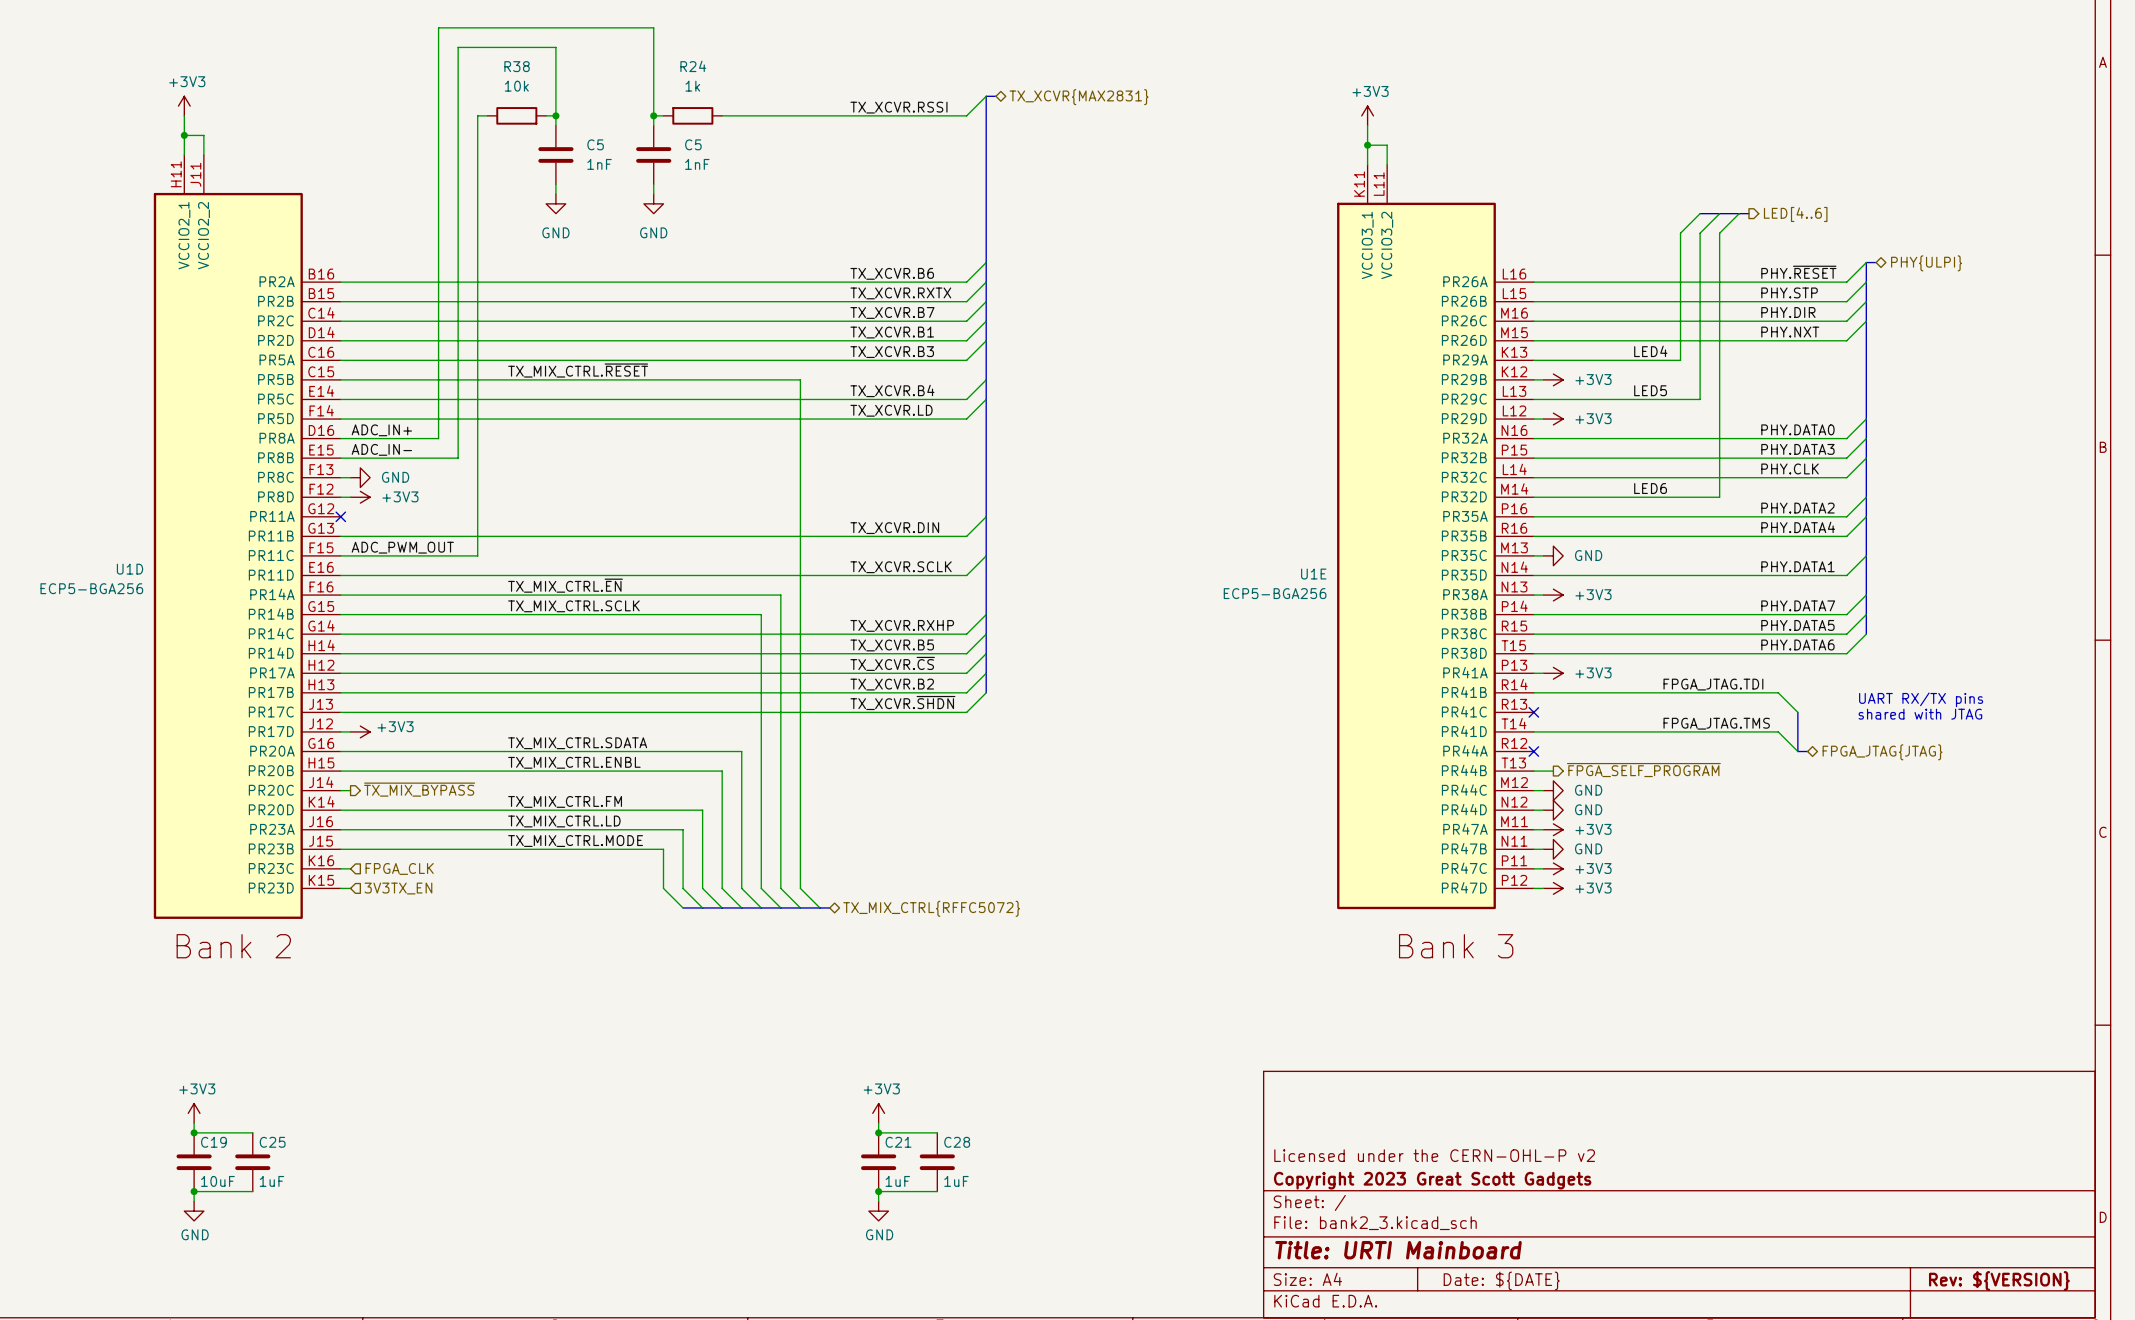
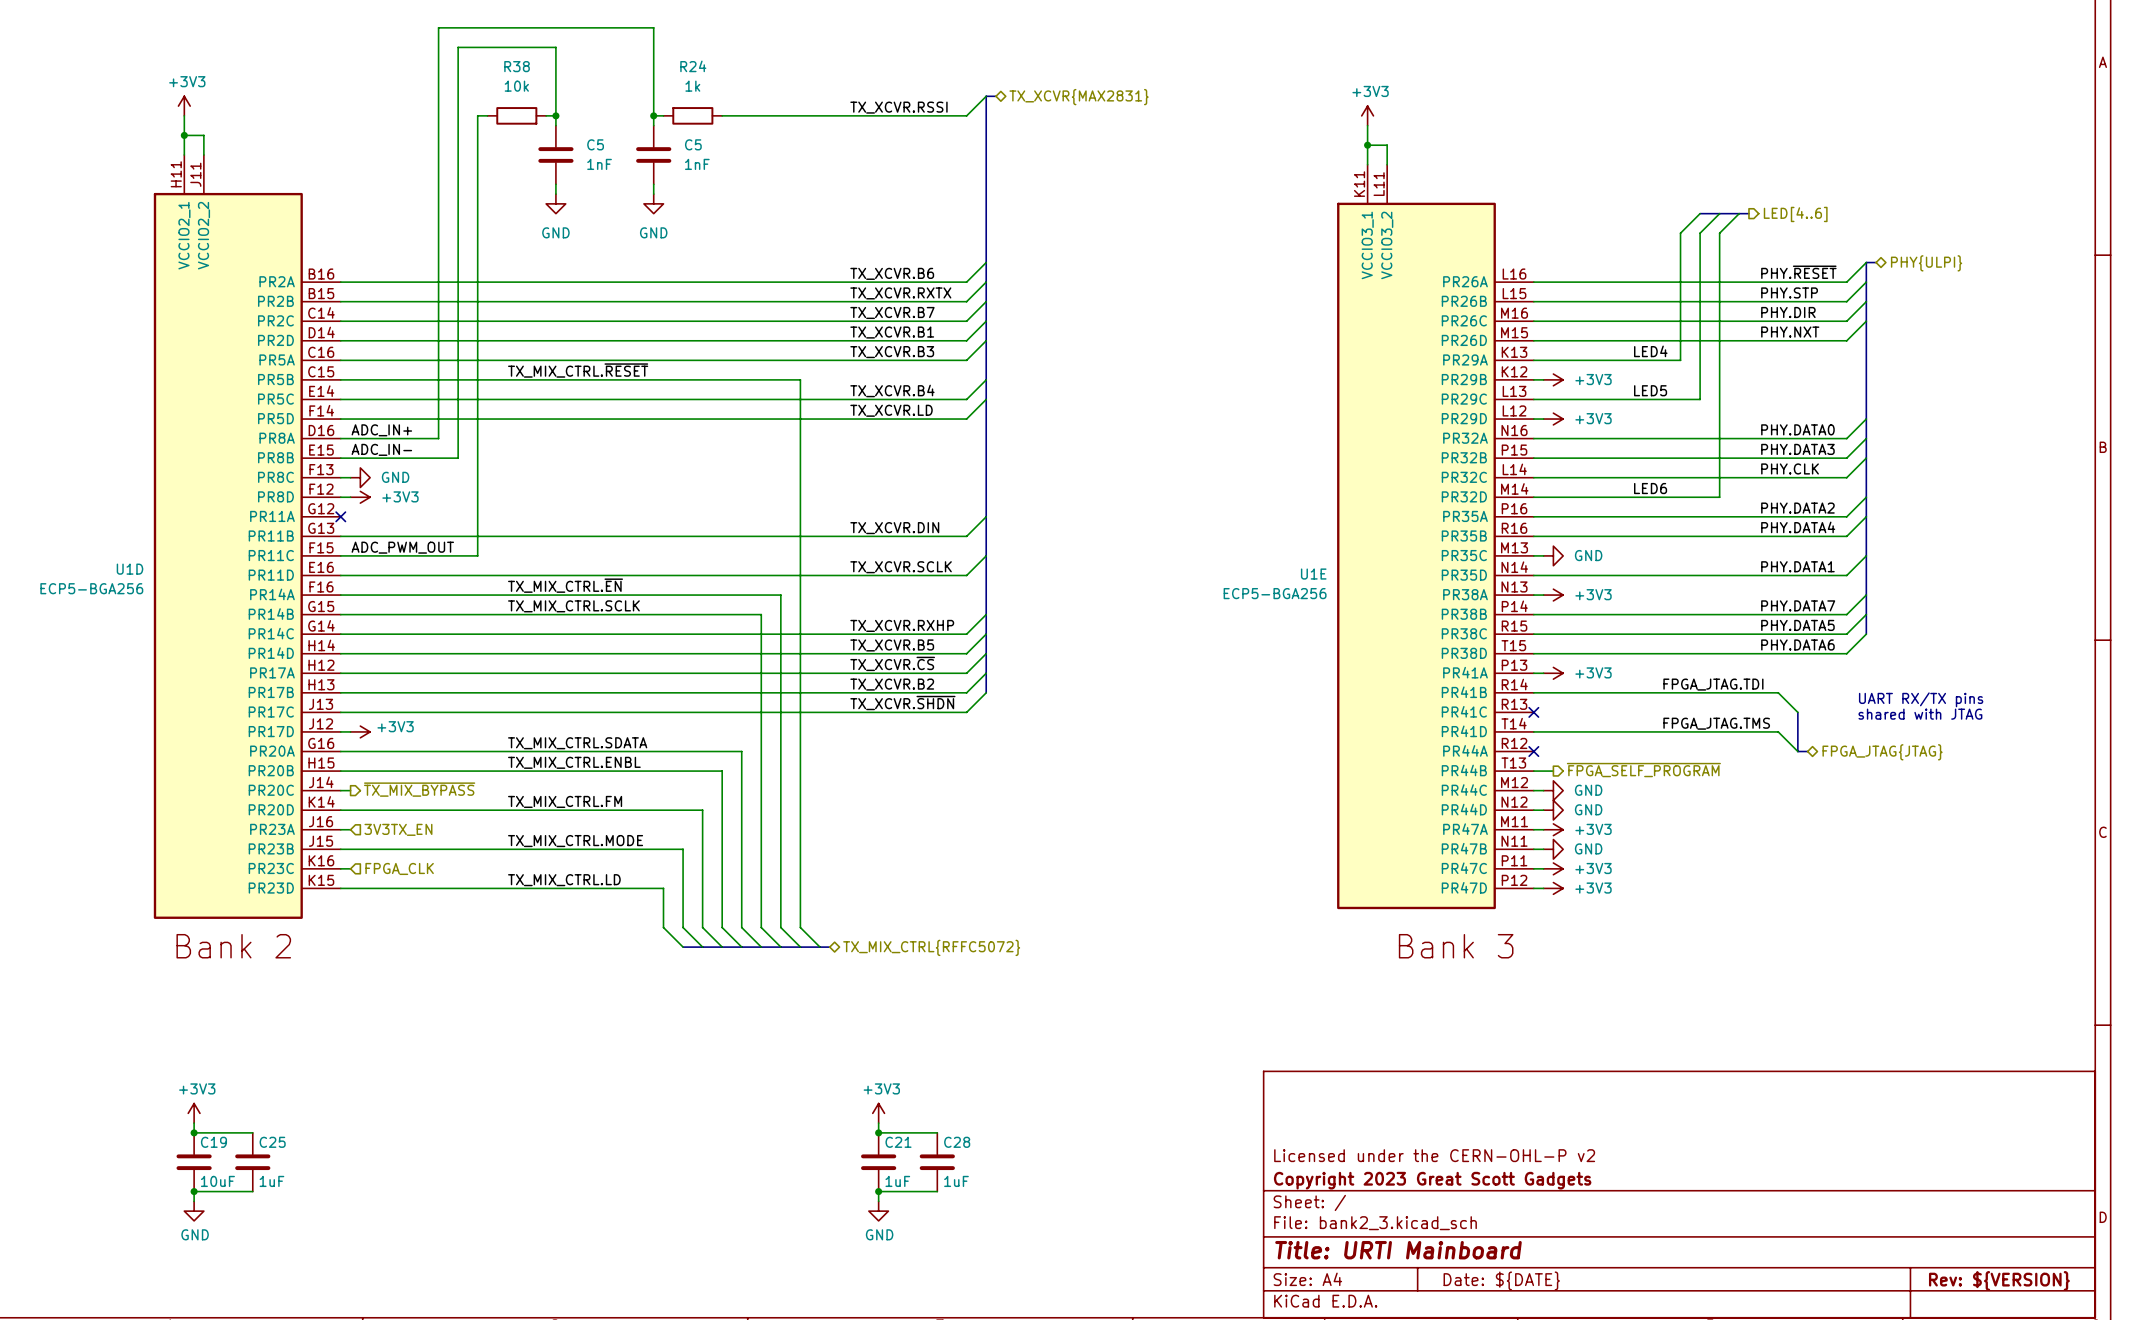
label position: TX_MIX_CTRL.LD (564, 821) -> TX_MIX_CTRL.LD (564, 880)
wire: (350, 829) (683, 829) (683, 849) -> none
wire: (663, 849) (663, 888) (683, 907) -> (663, 849) (683, 849)
wire: none -> (350, 888) (663, 888) (663, 927) (683, 947)
hierarchical label position: 3V3TX_EN (398, 888) -> 3V3TX_EN (398, 829)
wire: (683, 888) (702, 907) -> (683, 888) (683, 927) (702, 947)
wire: (702, 888) (722, 907) -> (702, 888) (702, 927) (722, 947)
wire: (722, 888) (741, 907) -> (722, 888) (722, 927) (741, 947)
wire: (741, 888) (761, 907) -> (741, 888) (741, 927) (761, 947)
wire: (761, 888) (780, 907) -> (761, 888) (761, 927) (780, 947)
wire: (780, 888) (800, 907) -> (780, 888) (780, 927) (800, 947)
wire: (800, 888) (819, 907) -> (800, 888) (800, 927) (819, 947)
bus: (683, 907) (829, 907) -> (683, 947) (829, 947)
hierarchical label position: TX_MIX_CTRL{RFFC5072} (931, 908) -> TX_MIX_CTRL{RFFC5072} (931, 947)

